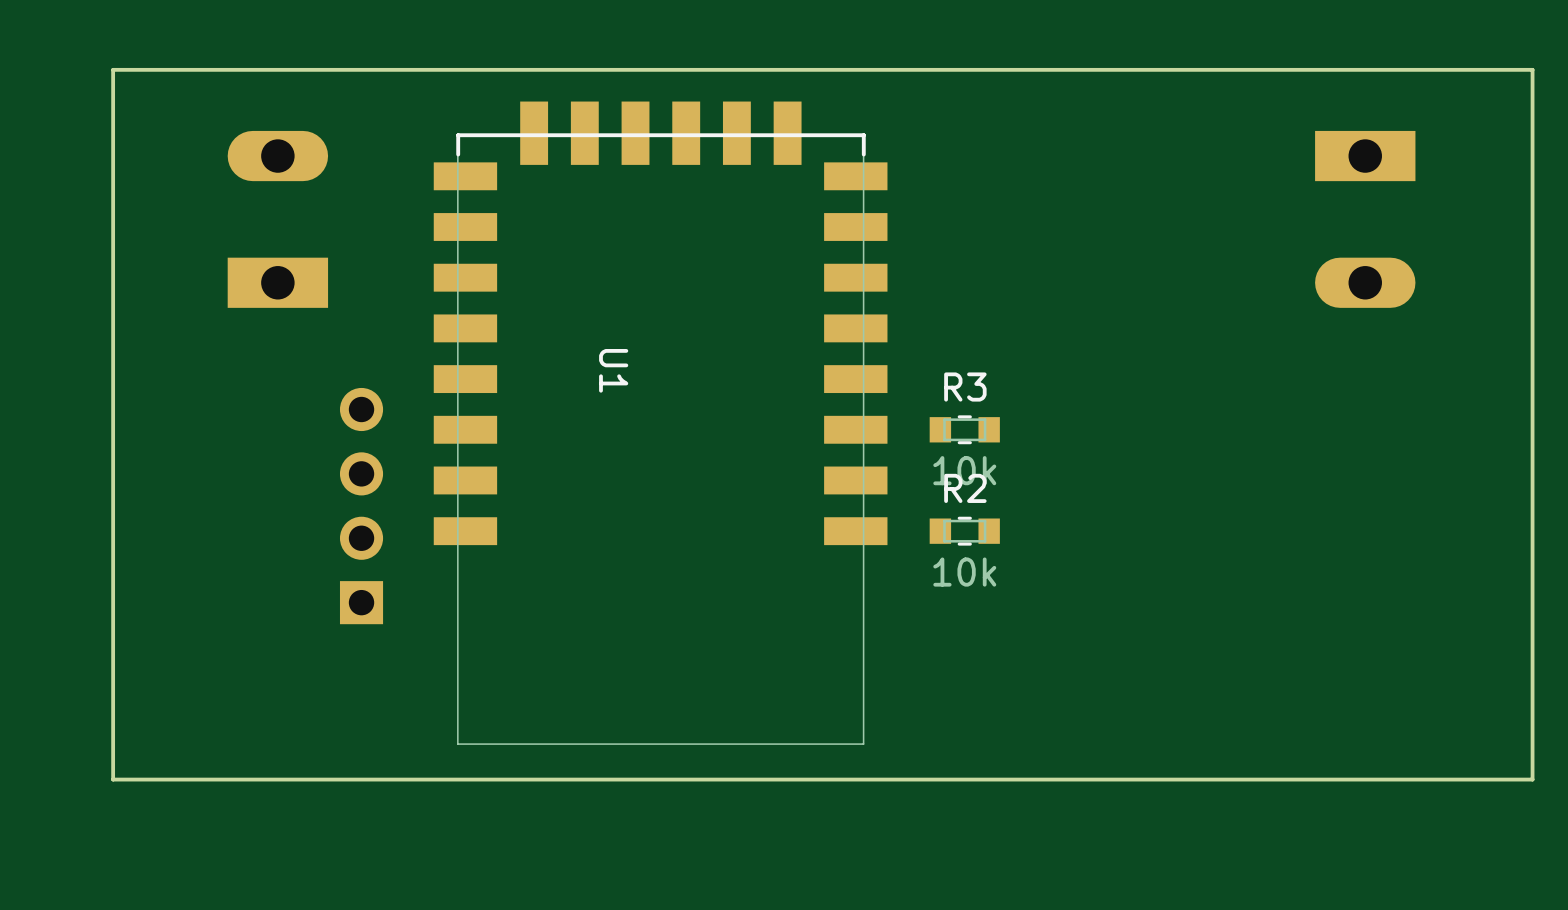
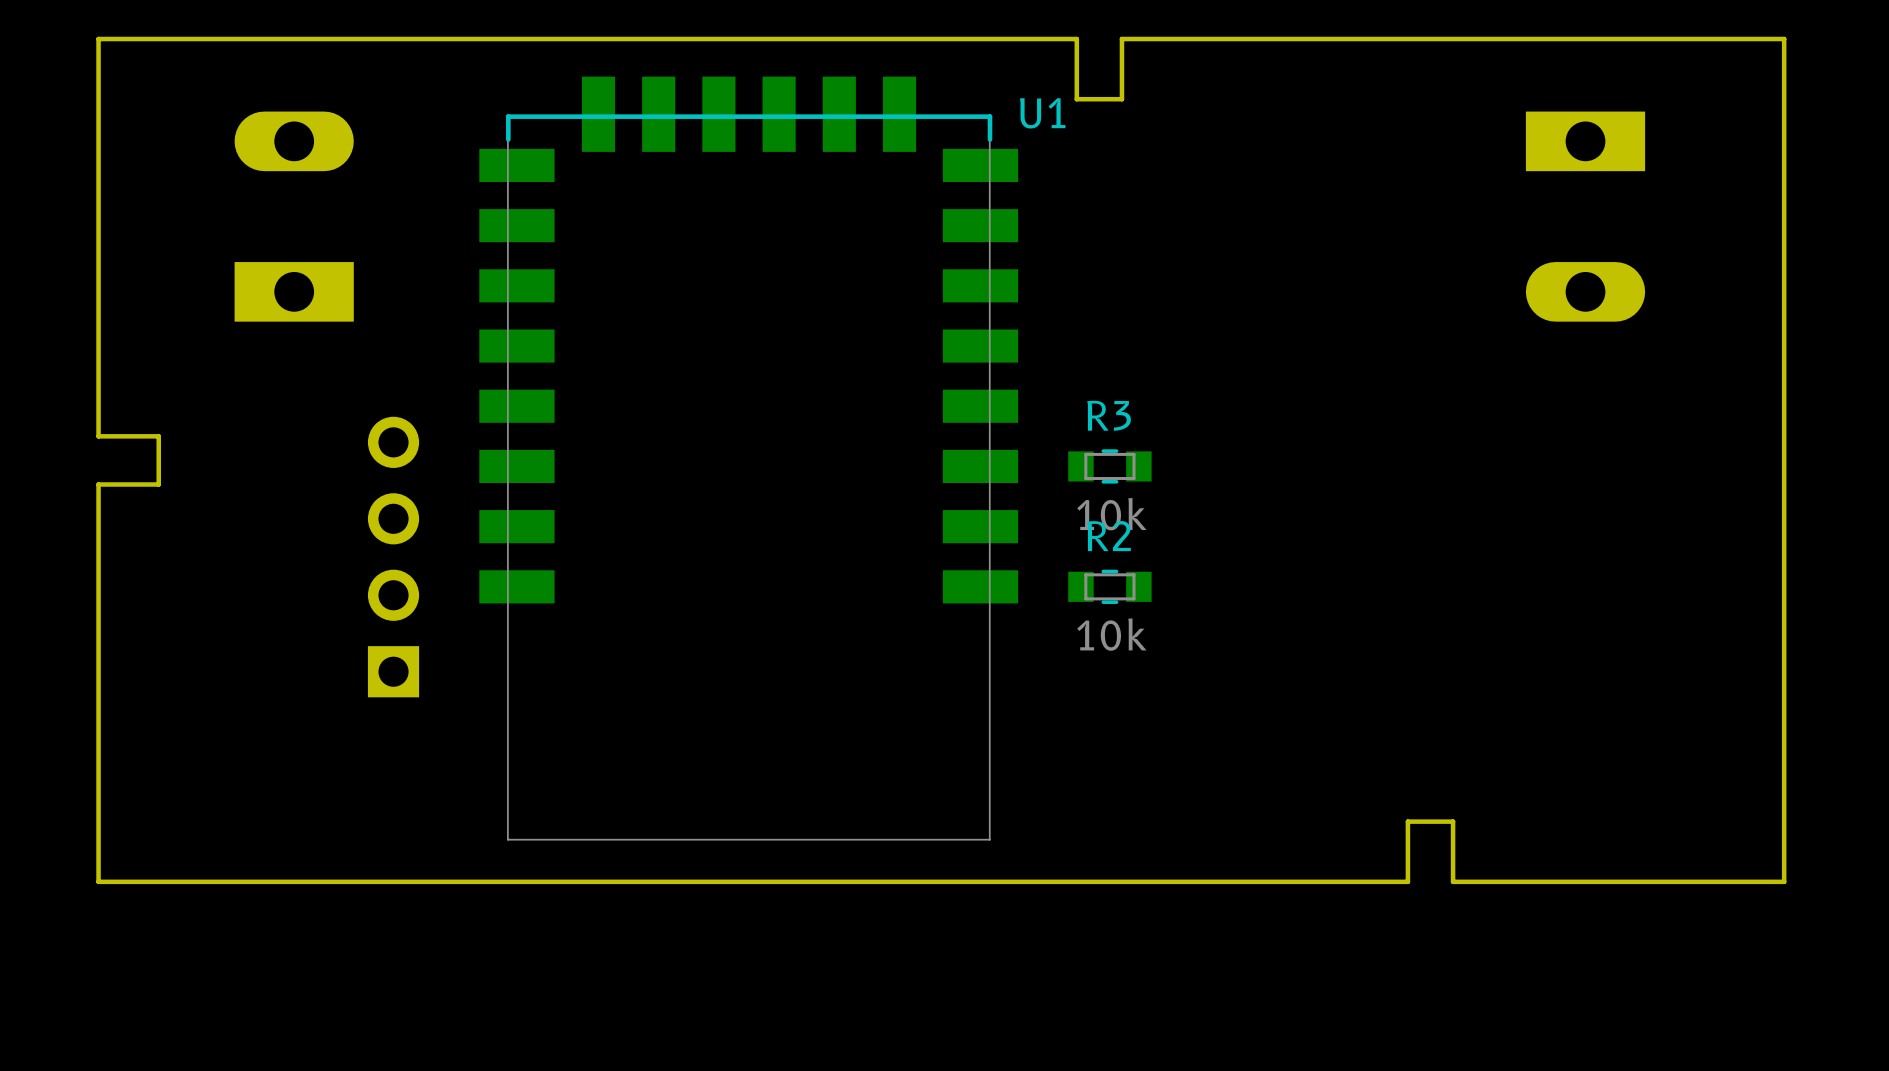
board edge: (974, 69) (936, 69) -> (1121, 39) (1121, 99) (1076, 99) (1076, 39)
U1 name rotation: 0° (613, 370) -> 90° counterclockwise (1042, 113)
U1 name position: U1 (613, 370) -> U1 (1042, 113)
board edge: (113, 404) (113, 444) -> (98, 436) (158, 436) (158, 484) (98, 484)
board edge: (1253, 779) (1215, 779) -> (1453, 881) (1453, 821) (1407, 821) (1407, 881)

